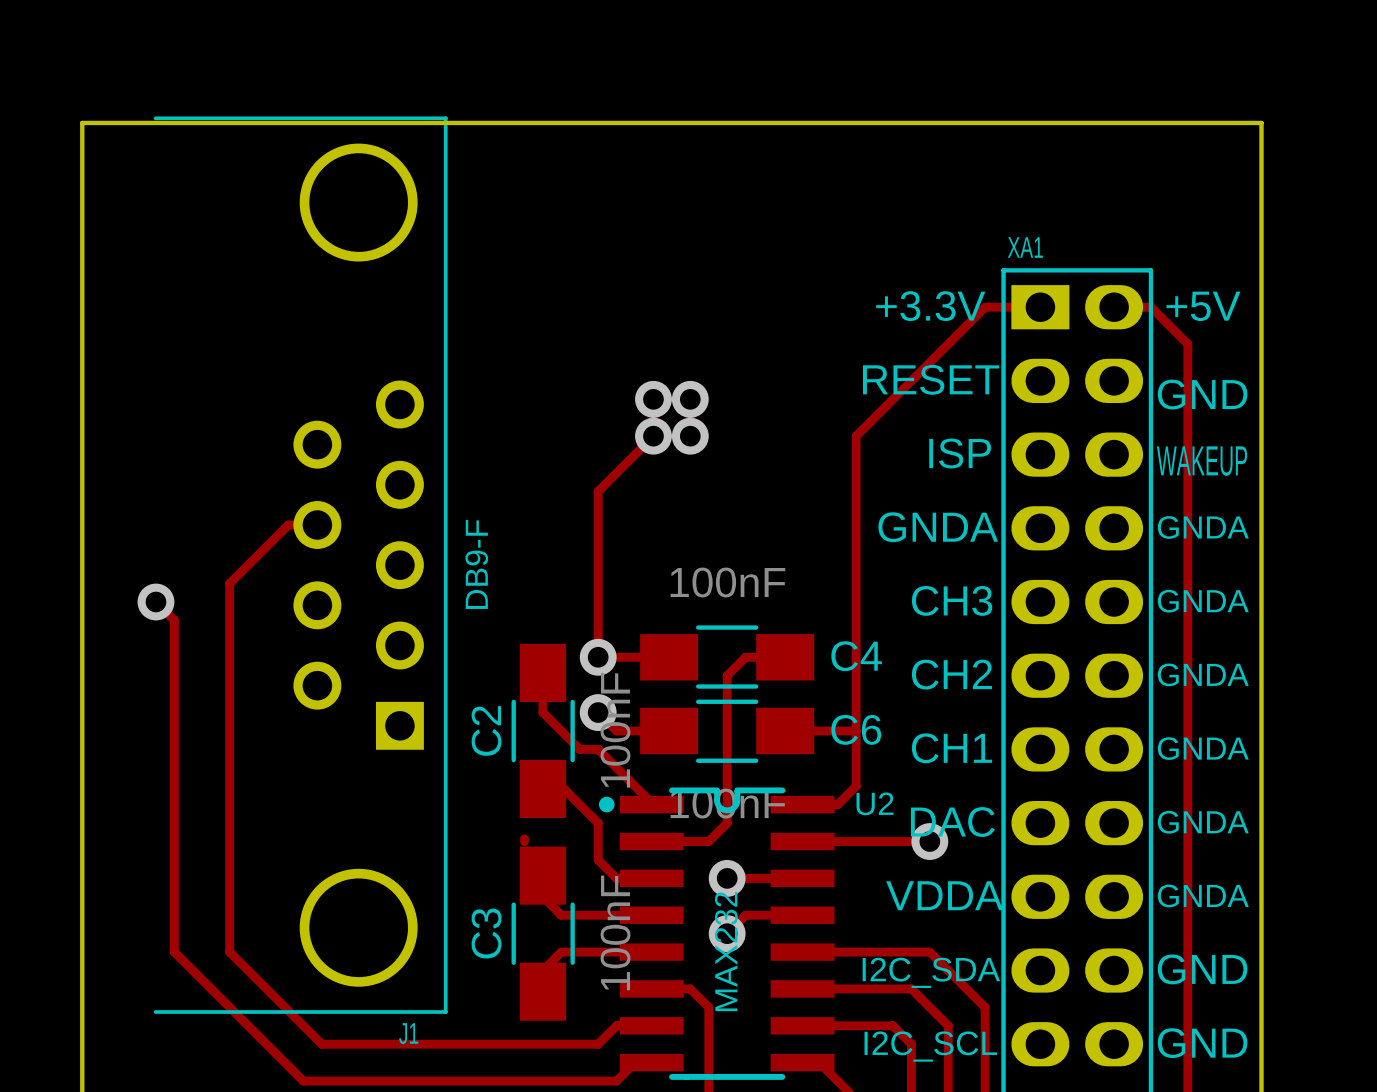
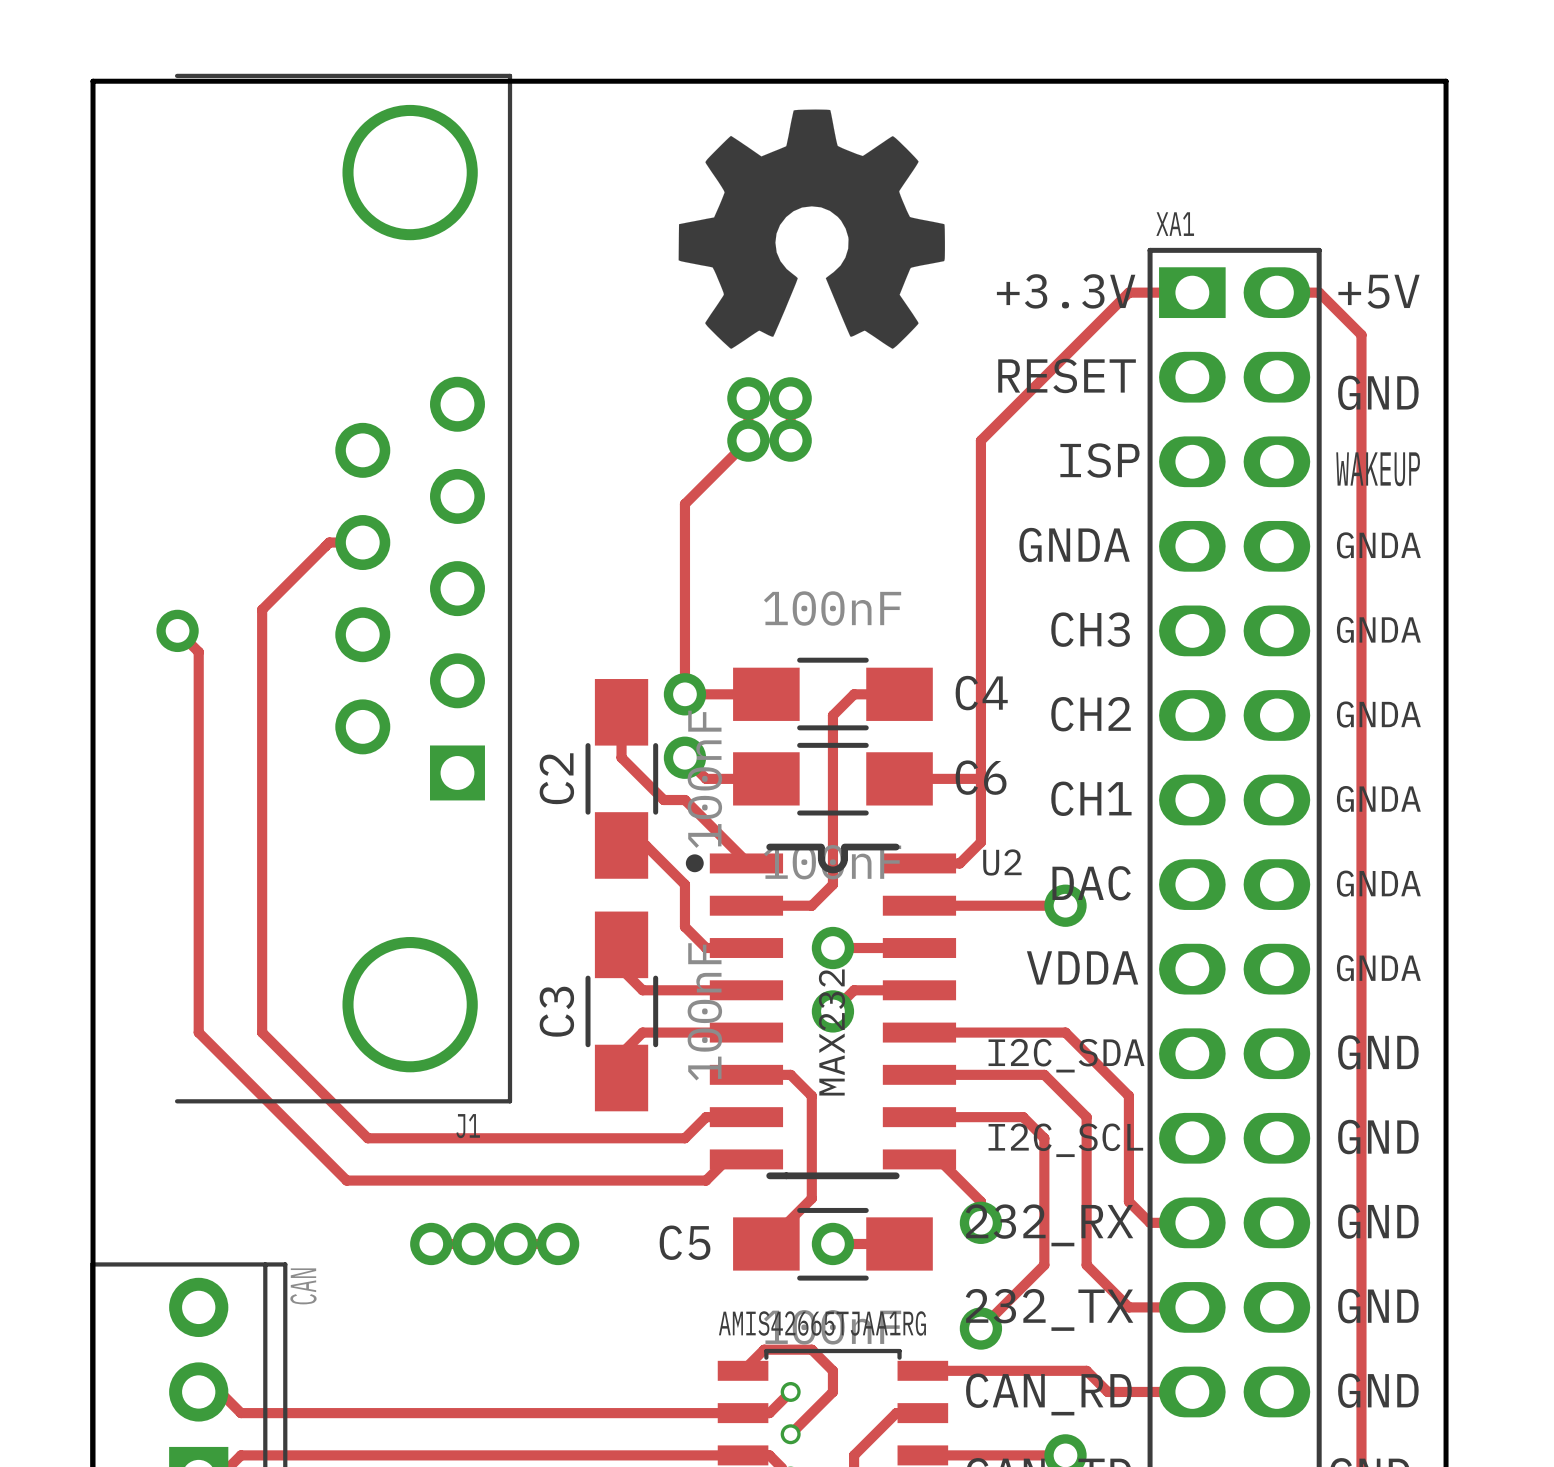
drawing: none -> [678, 109, 945, 349]
J1 value: DB9-F (476, 564) -> none
track: (524, 838) (524, 841) -> none

